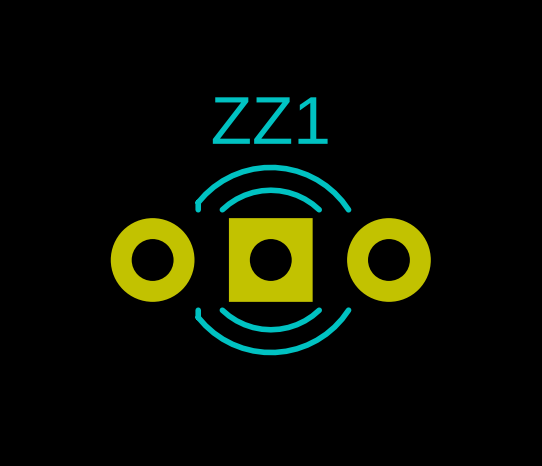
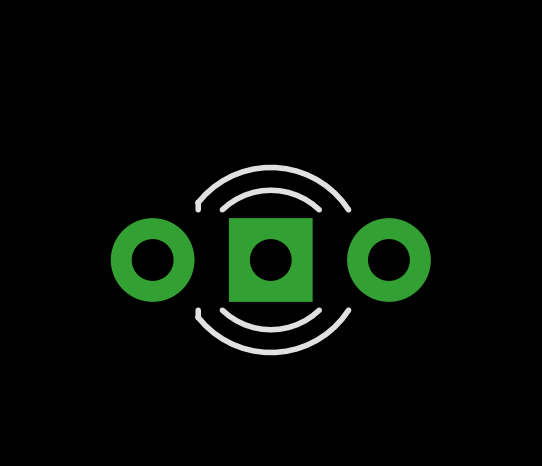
ZZ1 name: ZZ1 (270, 120) -> none

